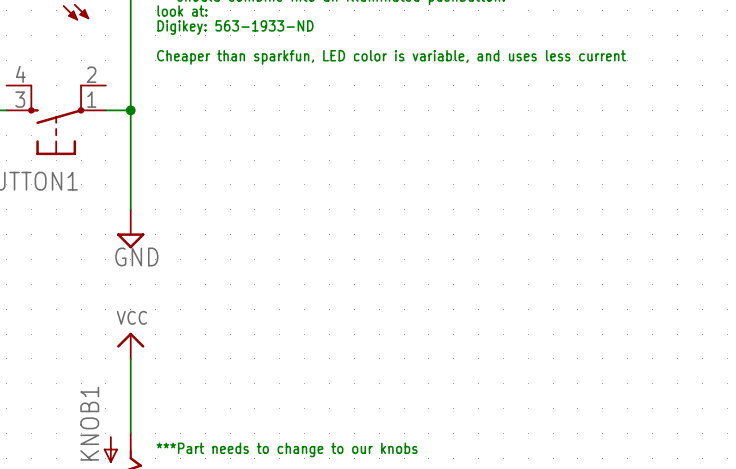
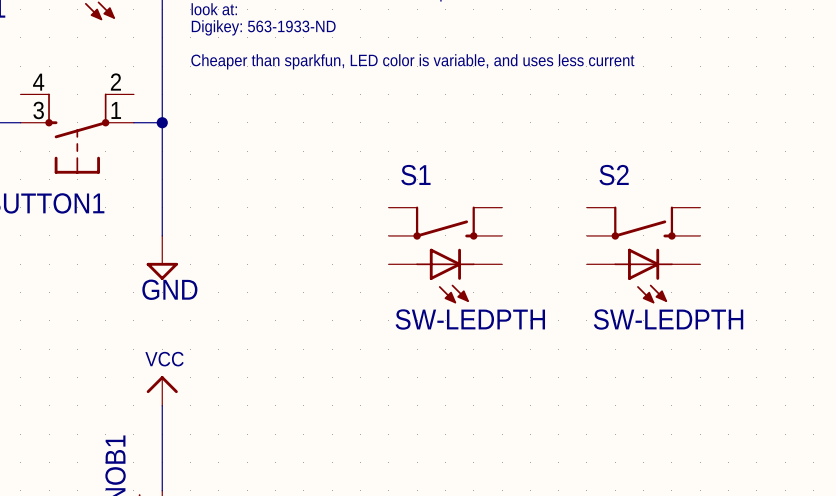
S1: none -> SW-LEDPTH (445, 254)
S2: none -> SW-LEDPTH (643, 254)

